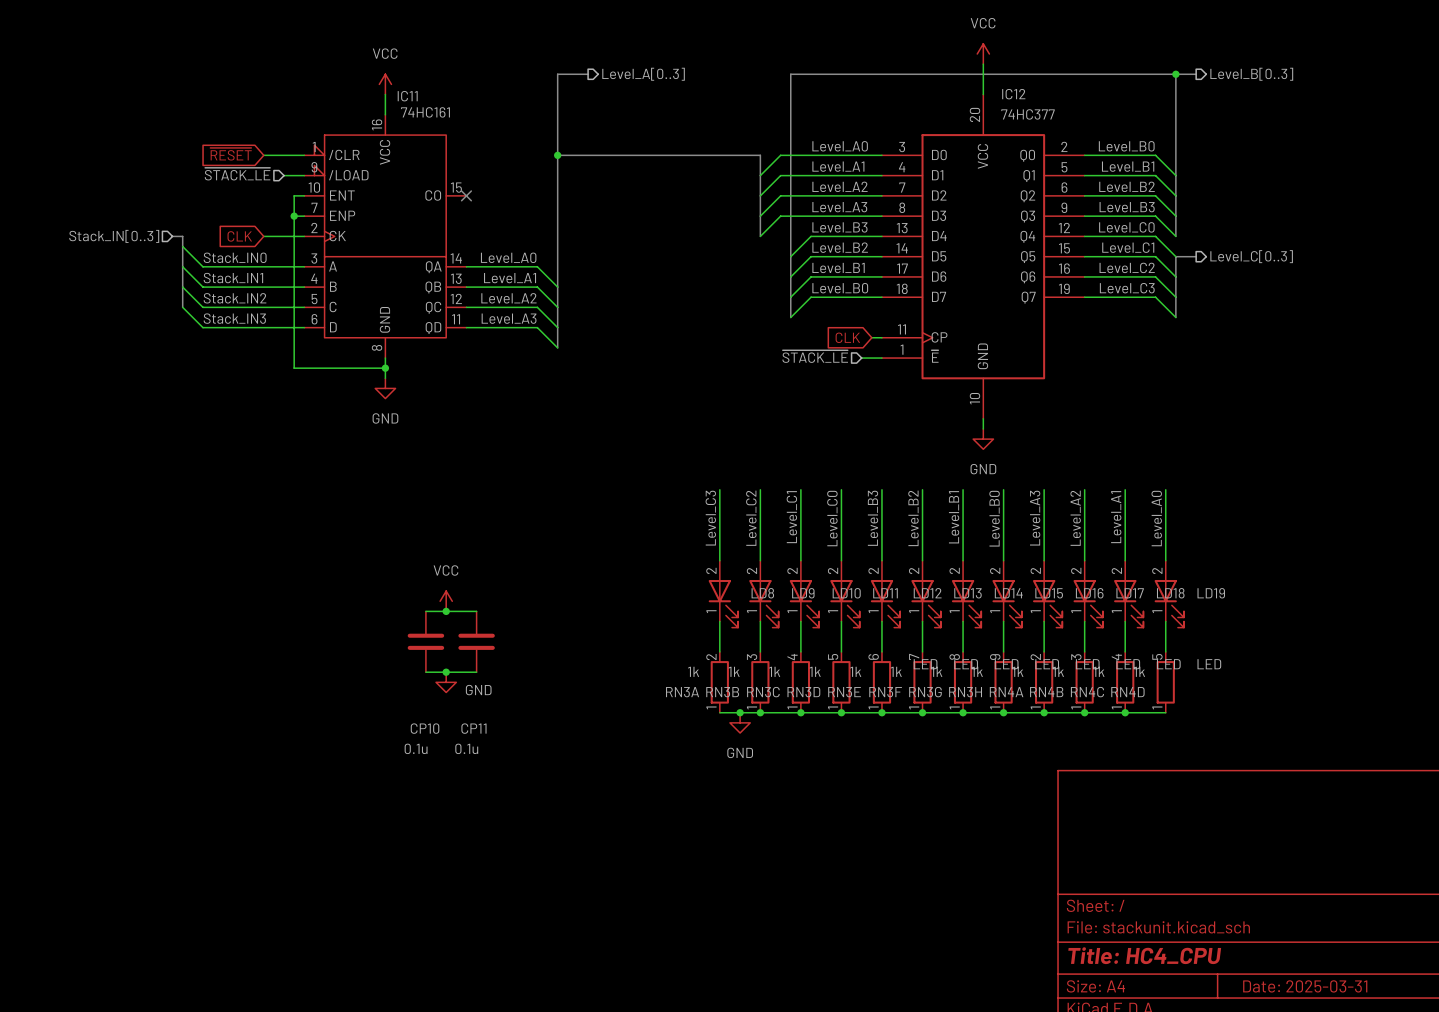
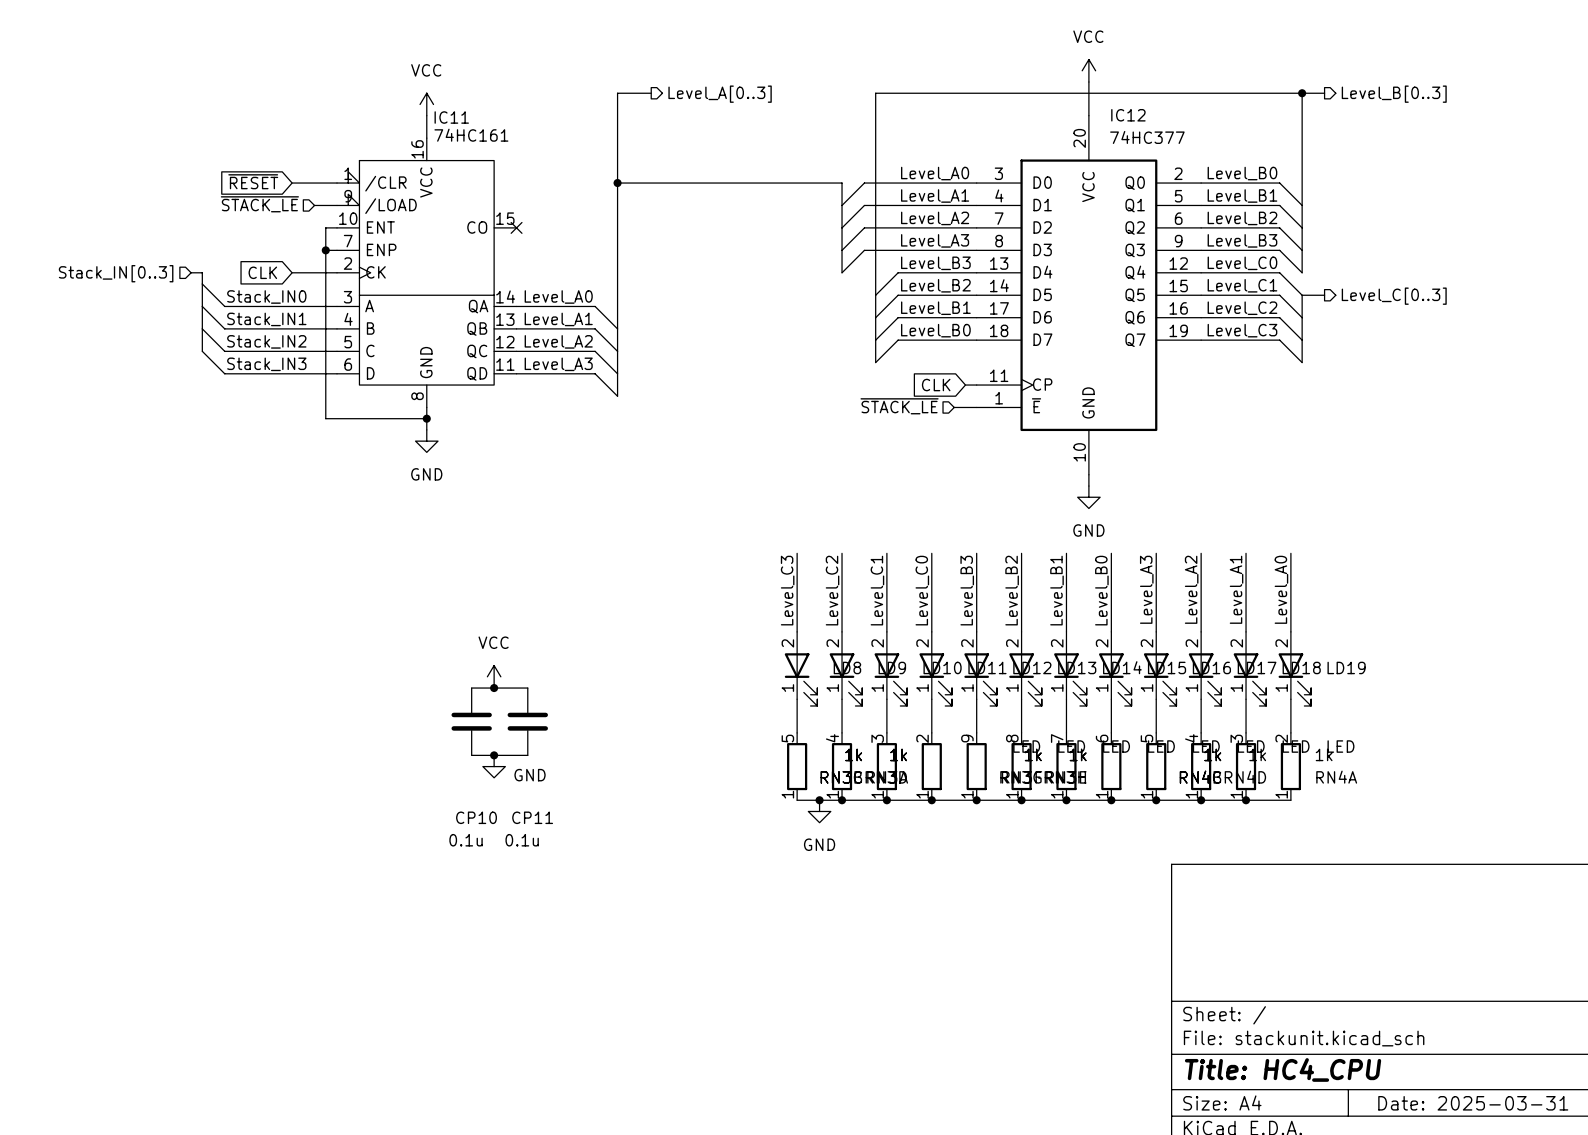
RN4A value position: 1k (1017, 671) -> 1k (1324, 754)
RN3A position: (719, 682) -> (931, 766)
RN3B position: (760, 682) -> (886, 766)
RN3C position: (800, 682) -> (842, 766)
RN3D position: (841, 682) -> (797, 766)
RN3E position: (881, 682) -> (1111, 766)
RN3F position: (922, 682) -> (1066, 766)
RN3G position: (963, 682) -> (1021, 766)
RN3H position: (1003, 682) -> (976, 766)
RN4A position: (1044, 682) -> (1290, 766)
RN4B position: (1084, 682) -> (1246, 766)
RN4C position: (1125, 682) -> (1201, 766)
RN4D position: (1165, 682) -> (1156, 766)
RN4A name position: RN4A (1006, 692) -> RN4A (1336, 777)

